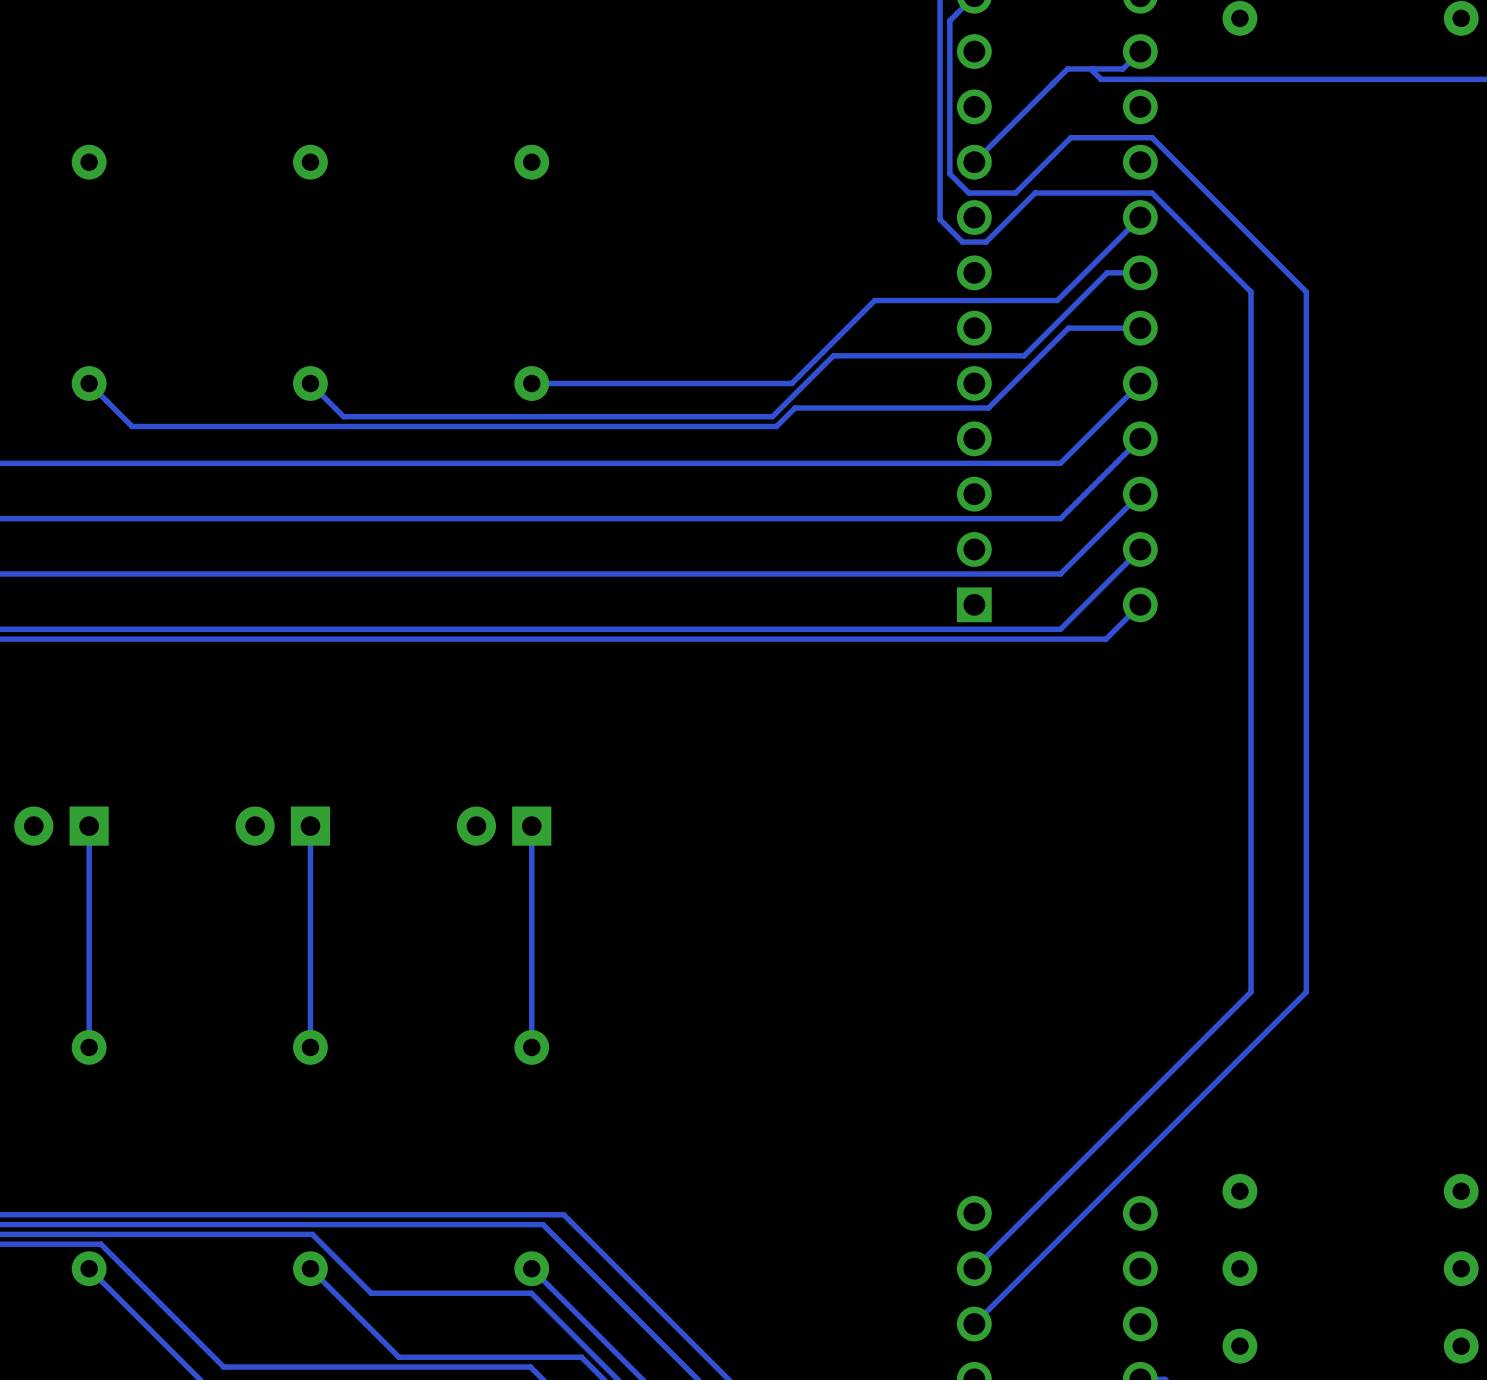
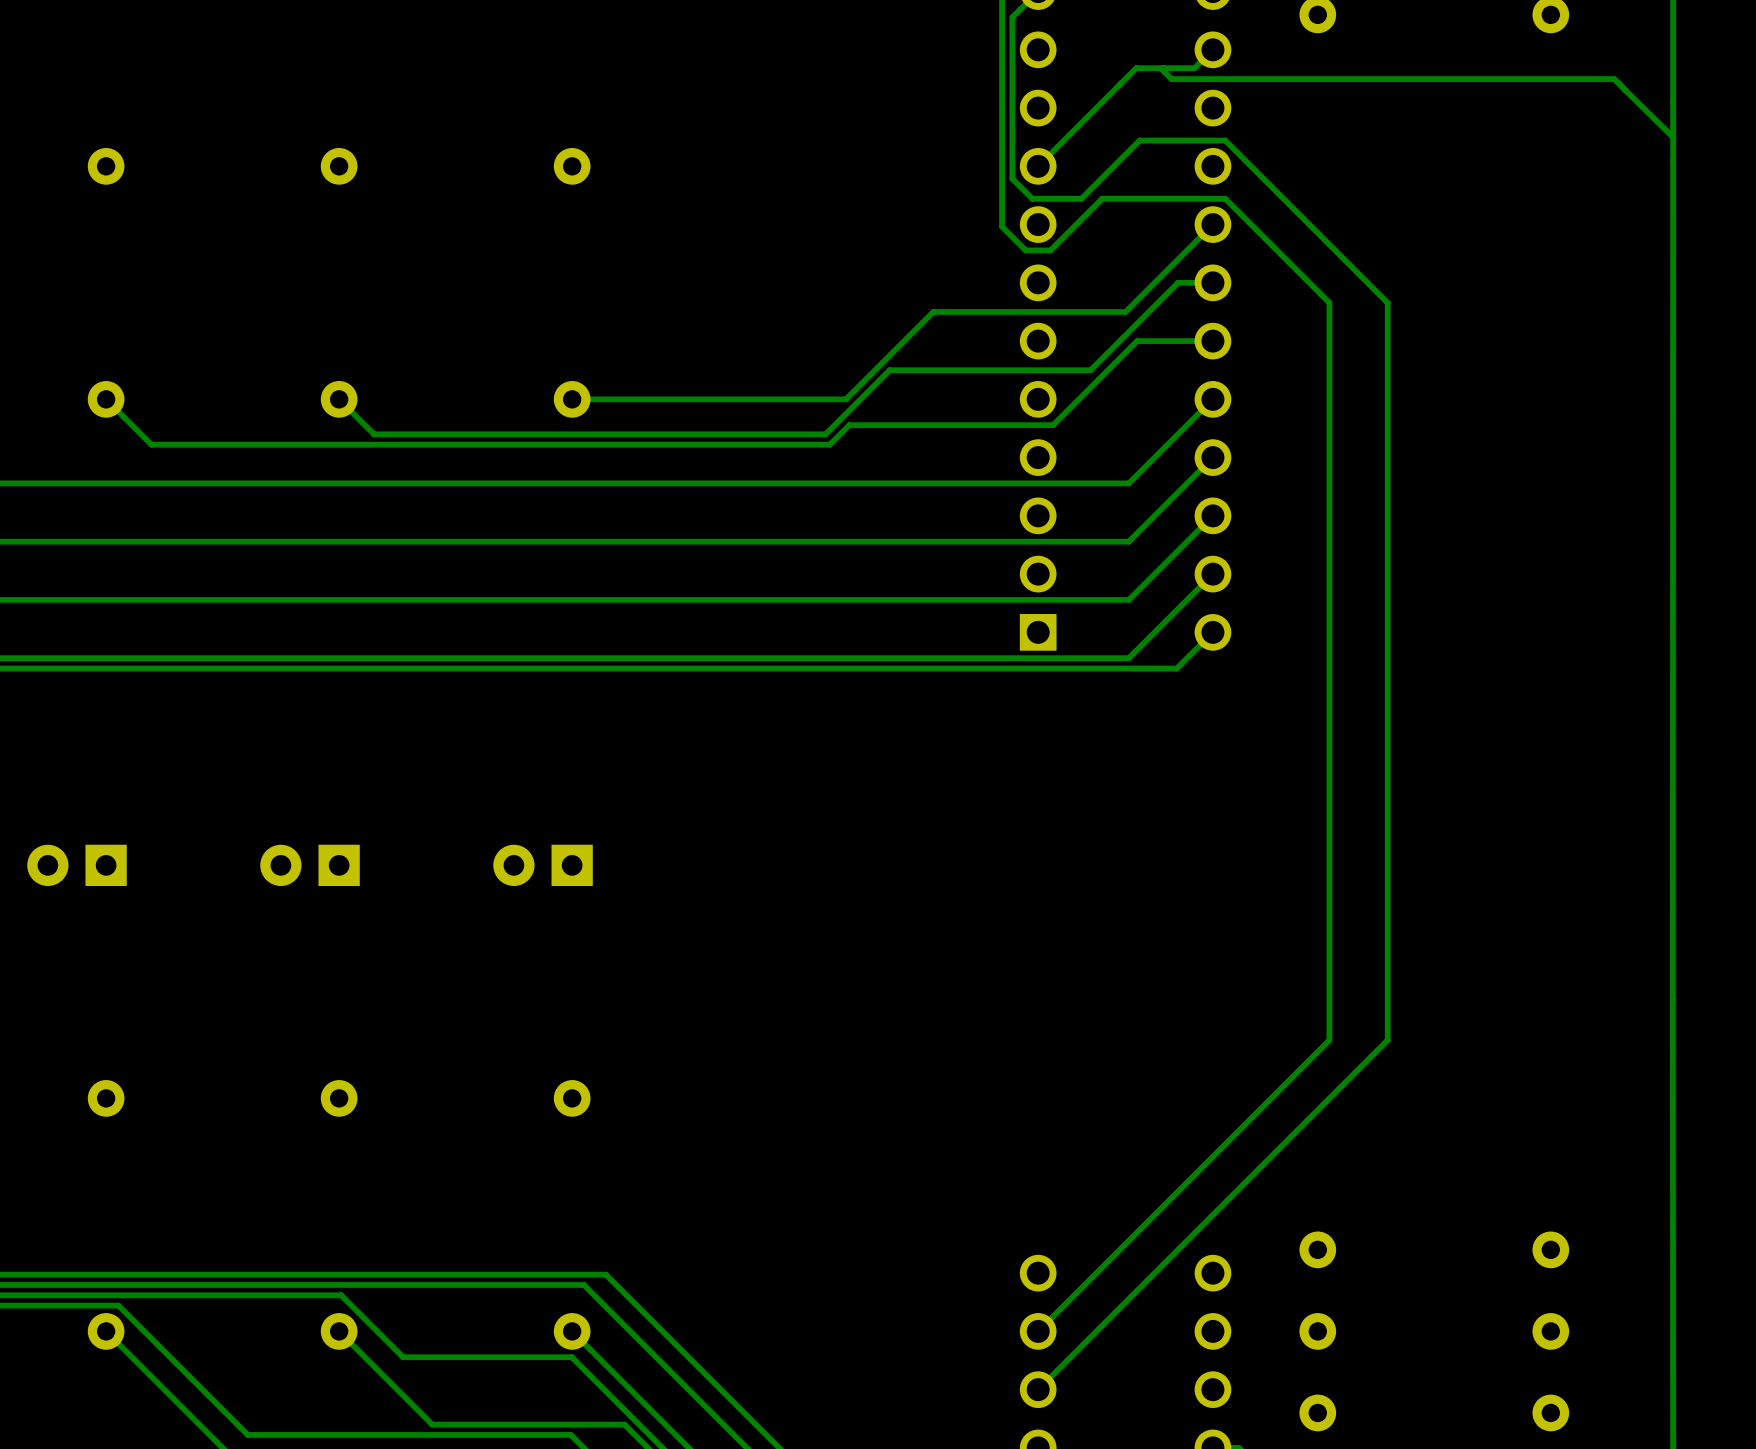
track: (89, 826) (89, 1047) -> none
track: (310, 826) (310, 1047) -> none
track: (531, 826) (531, 1047) -> none

